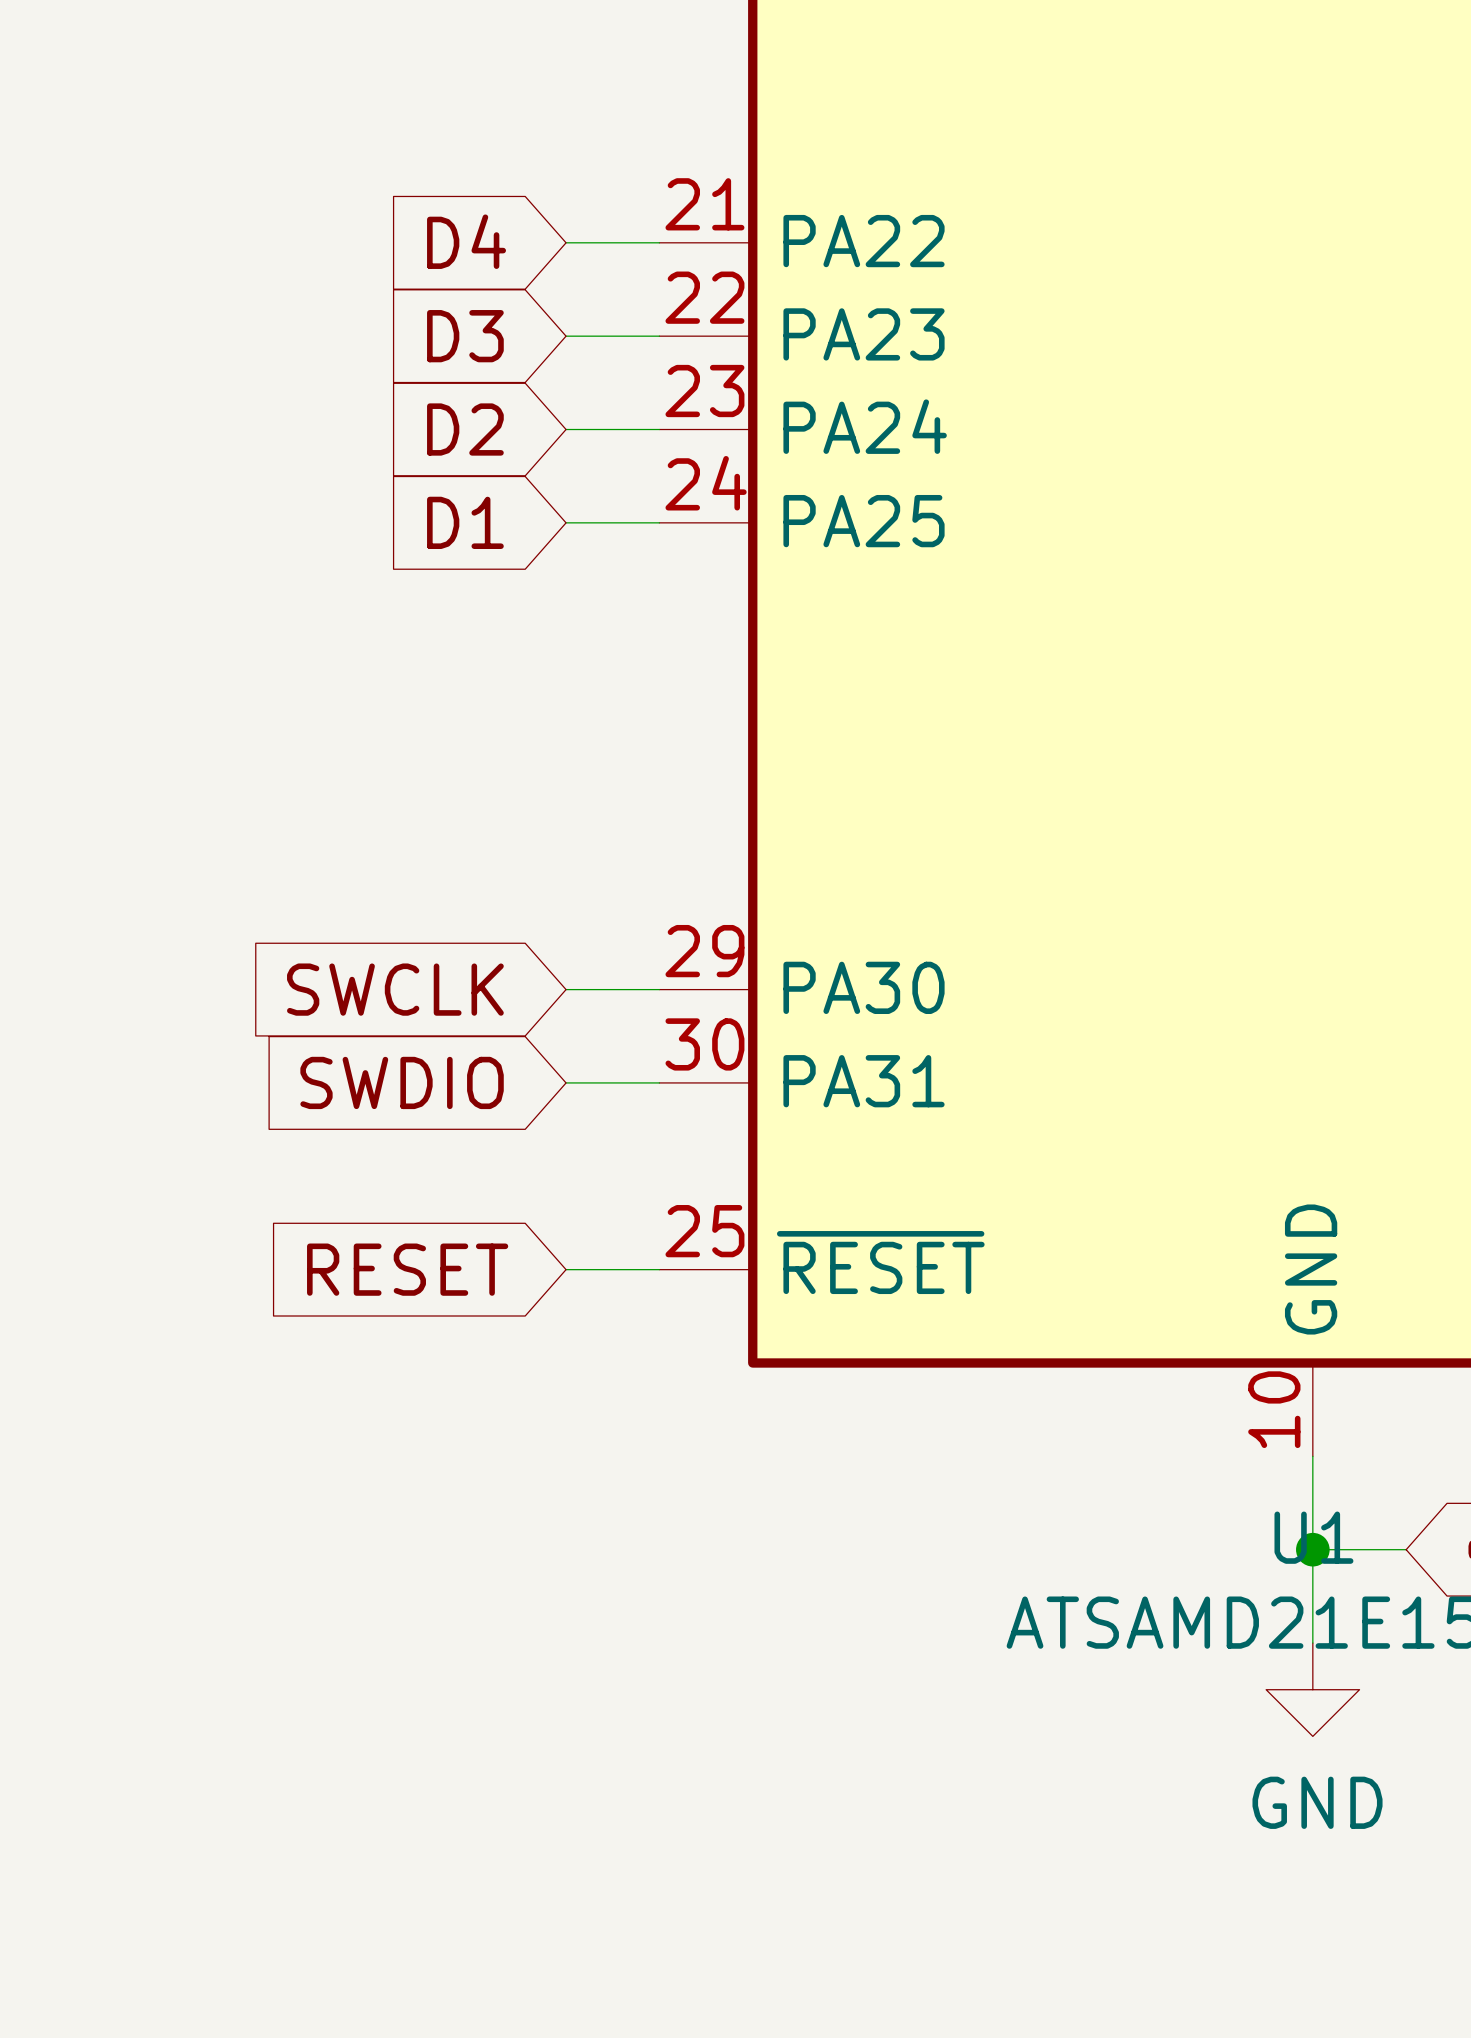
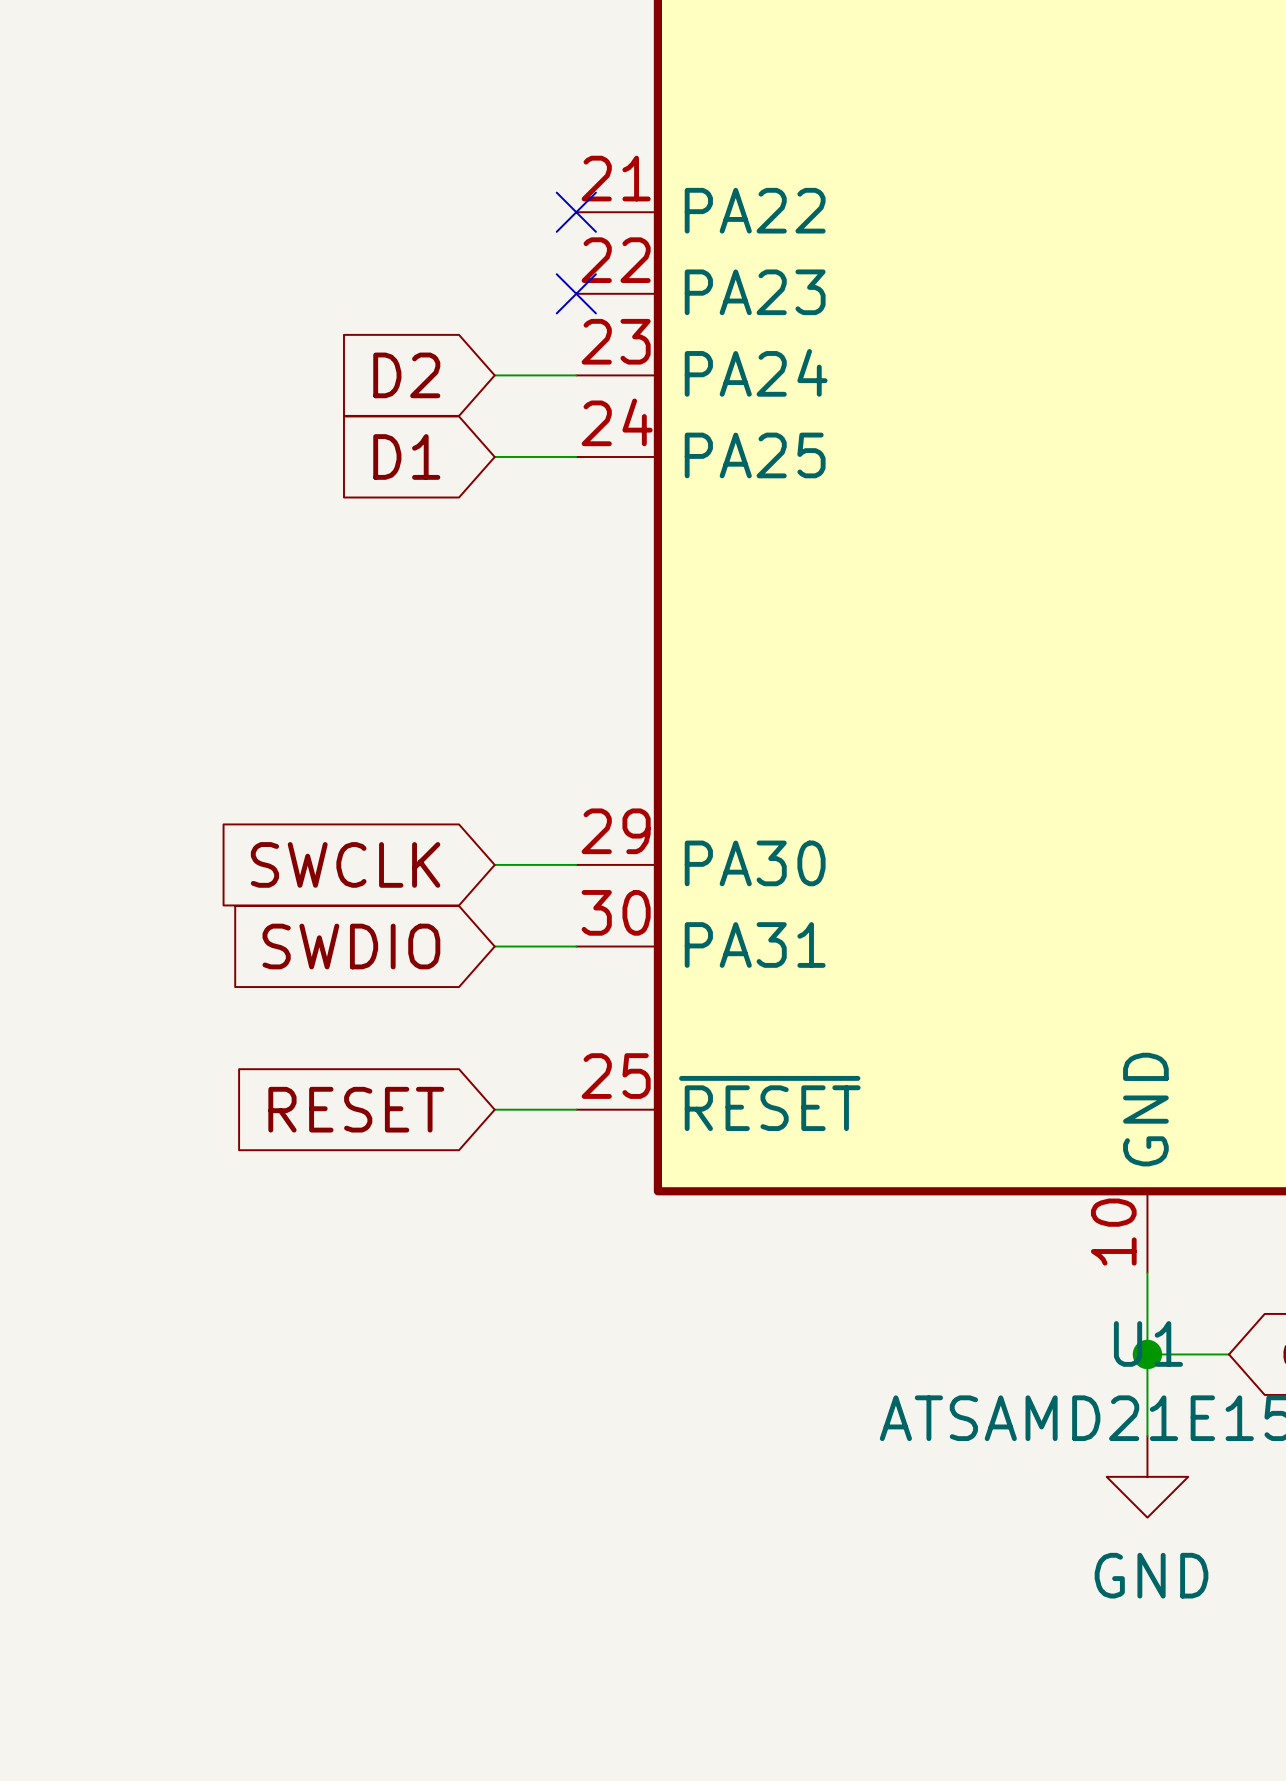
global label: D4 (466, 241) -> none
wire: (566, 242) (659, 242) -> none
no-connect mark: none -> (576, 212)
global label: D3 (465, 336) -> none
wire: (566, 336) (659, 336) -> none
no-connect mark: none -> (576, 293)

